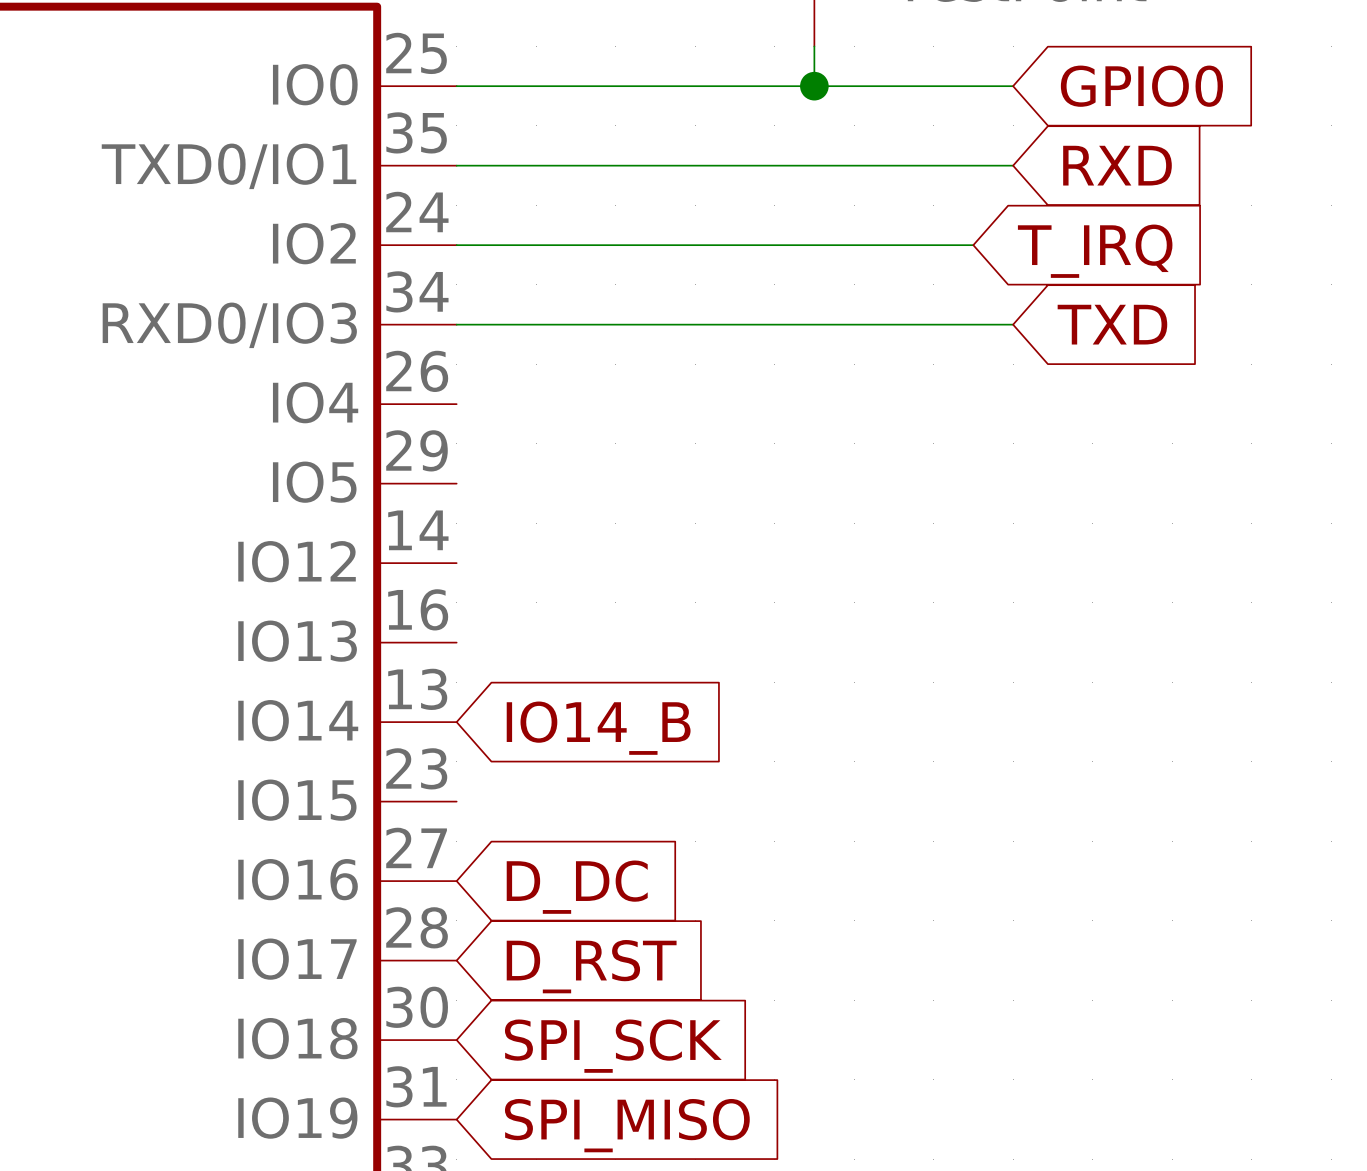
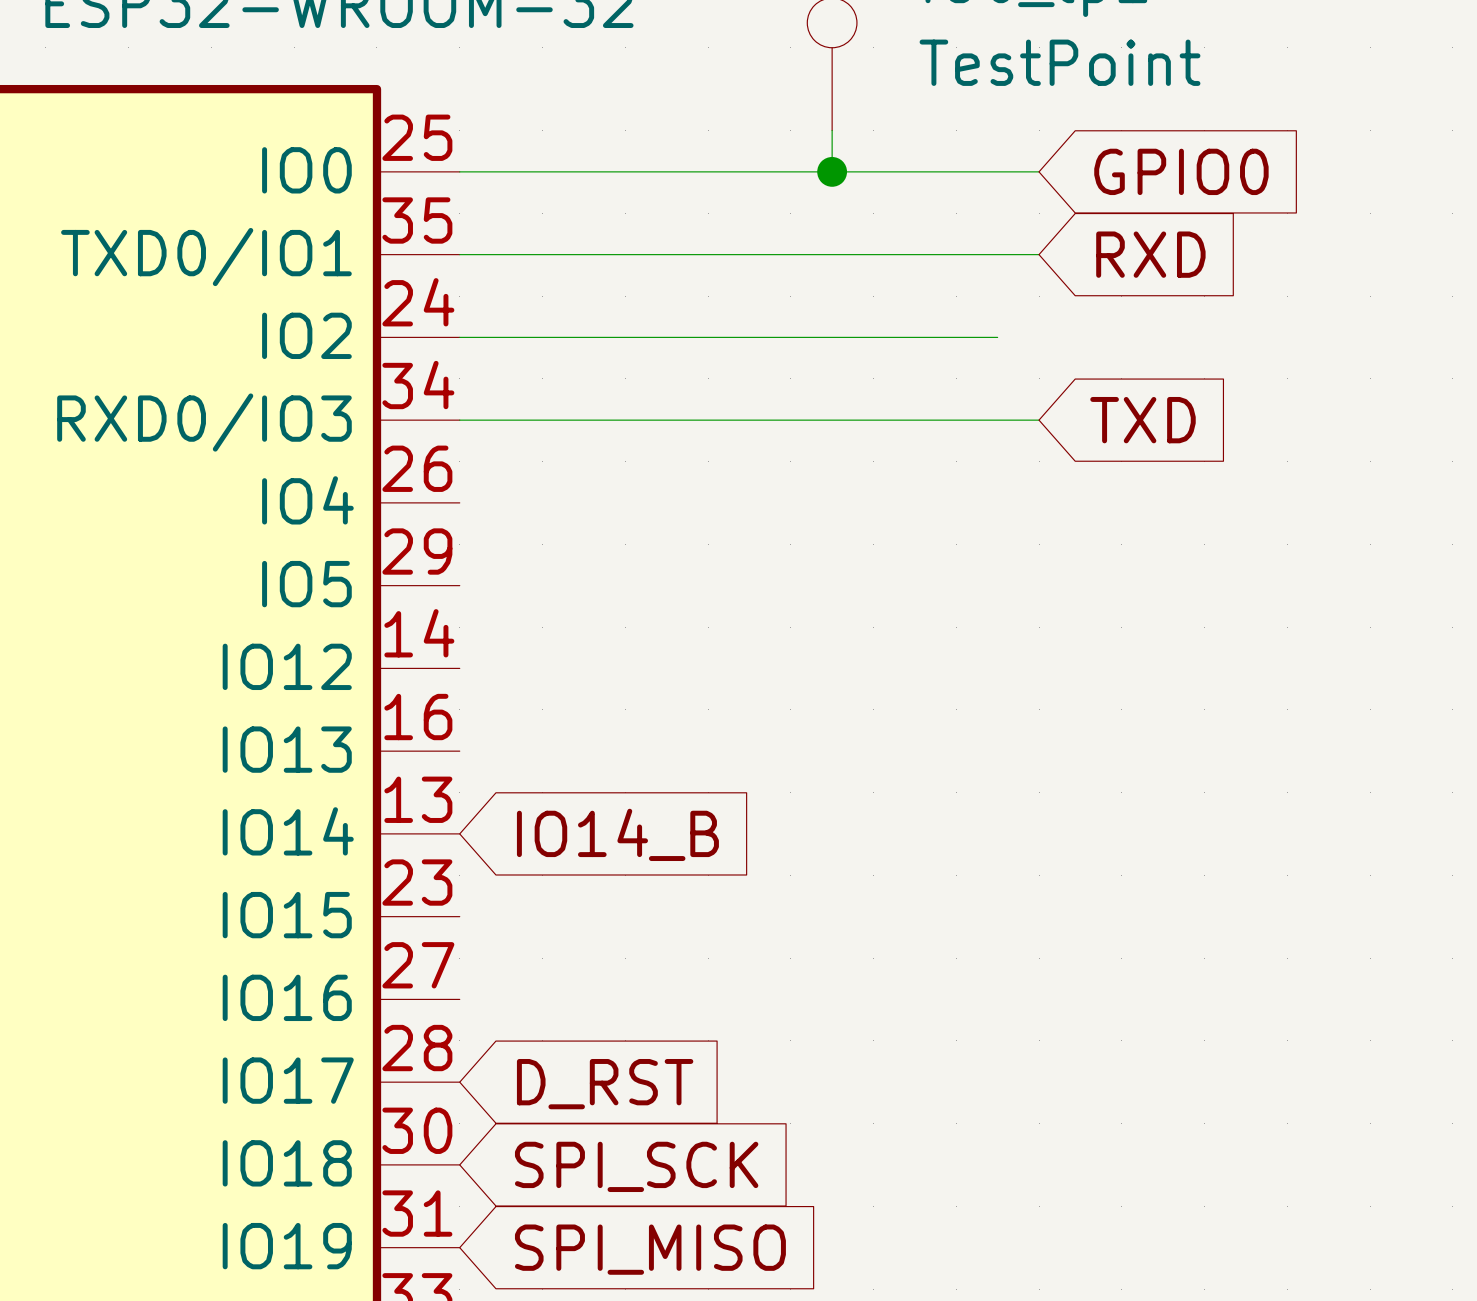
global label: T_IRQ (1095, 251) -> none
global label: D_DC (577, 887) -> none

